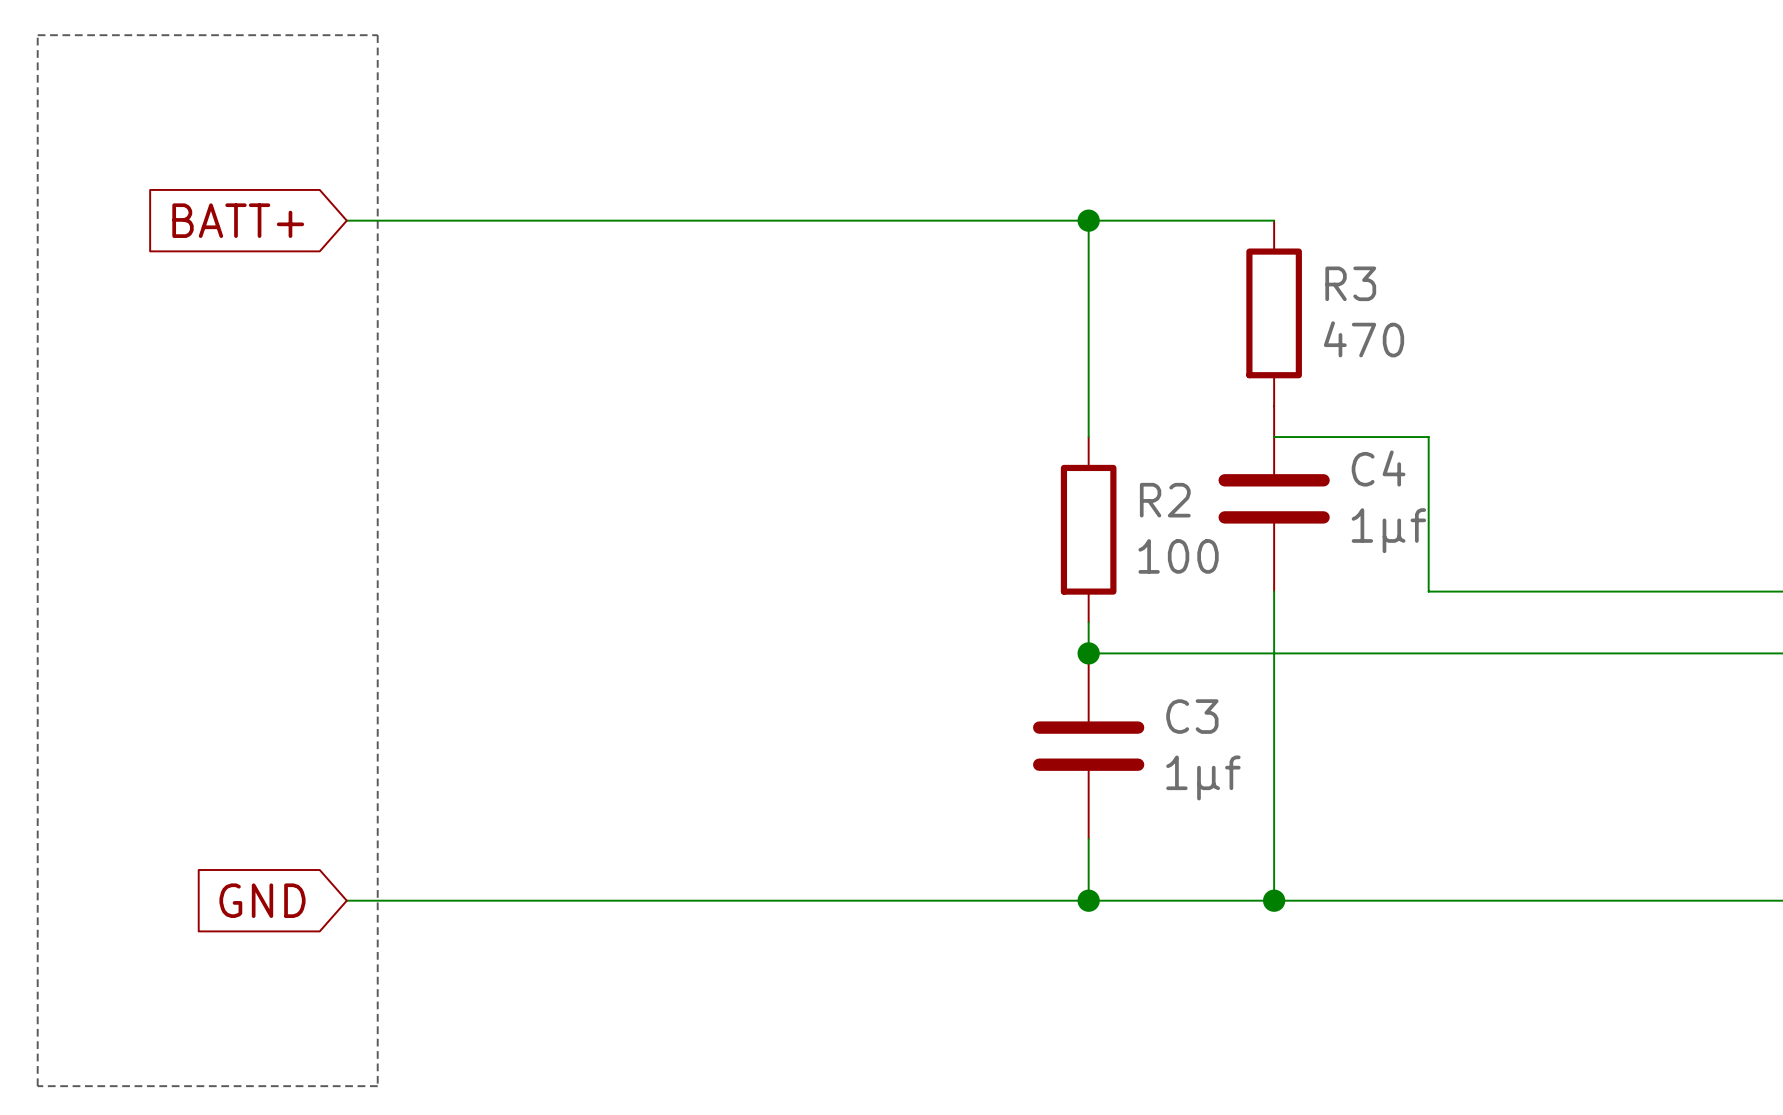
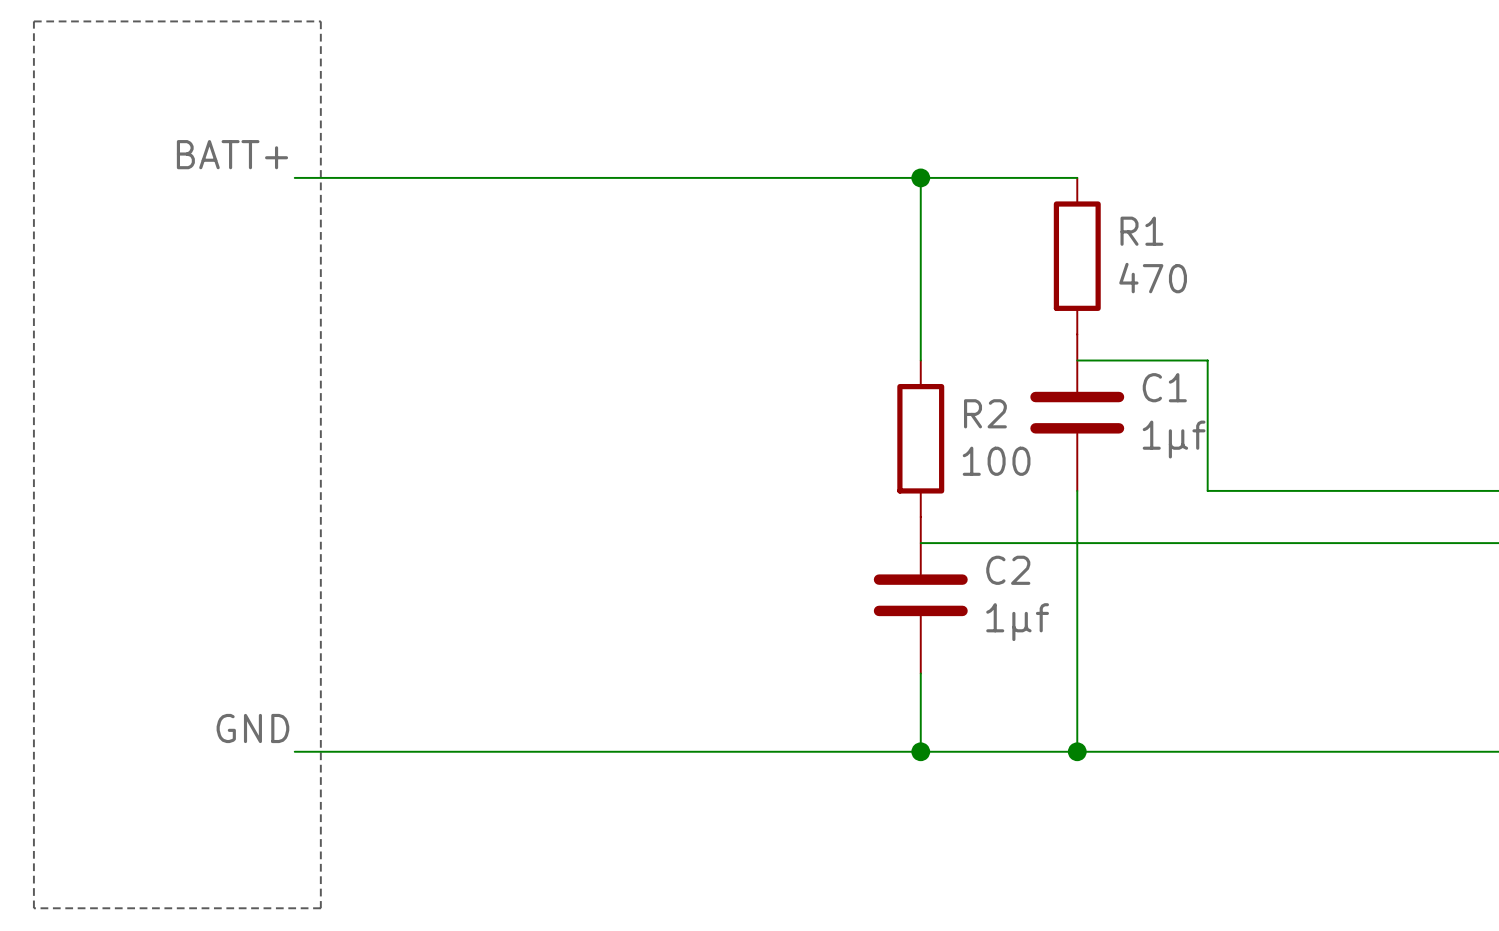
label: none -> BATT+ (232, 154)
global label: BATT+ (238, 220) -> none
R3 name: R3 (1350, 283) -> R1 (1141, 231)
C4 name: C4 (1378, 468) -> C1 (1164, 387)
junction: (1088, 653) -> none
C2: none -> 1µf (920, 595)
C3: 1µf (1088, 746) -> none
label: none -> GND (252, 728)
global label: GND (262, 900) -> none

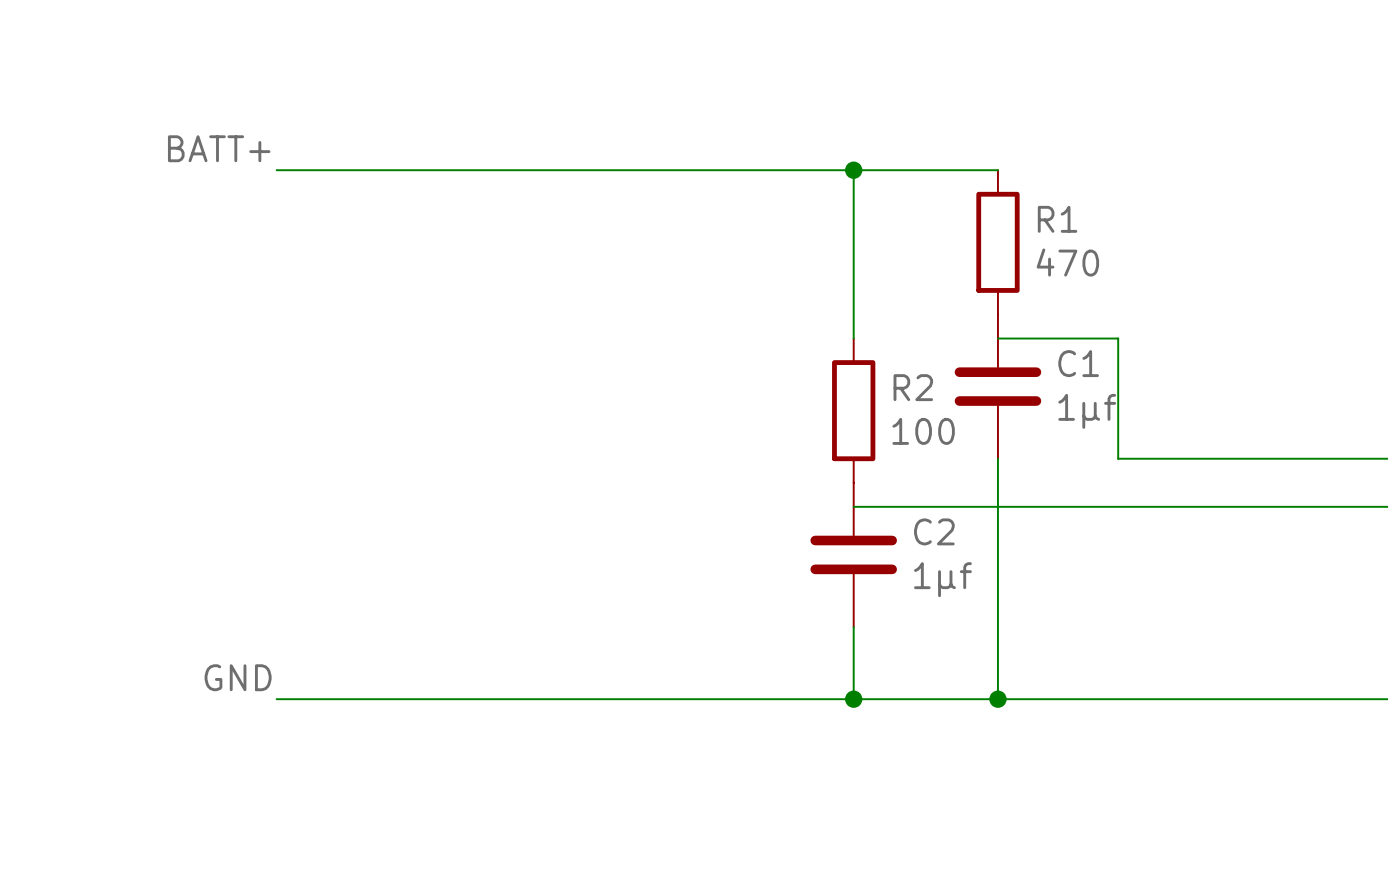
line: (33, 21) (320, 21) (320, 908) (33, 908) (33, 21) -> none

